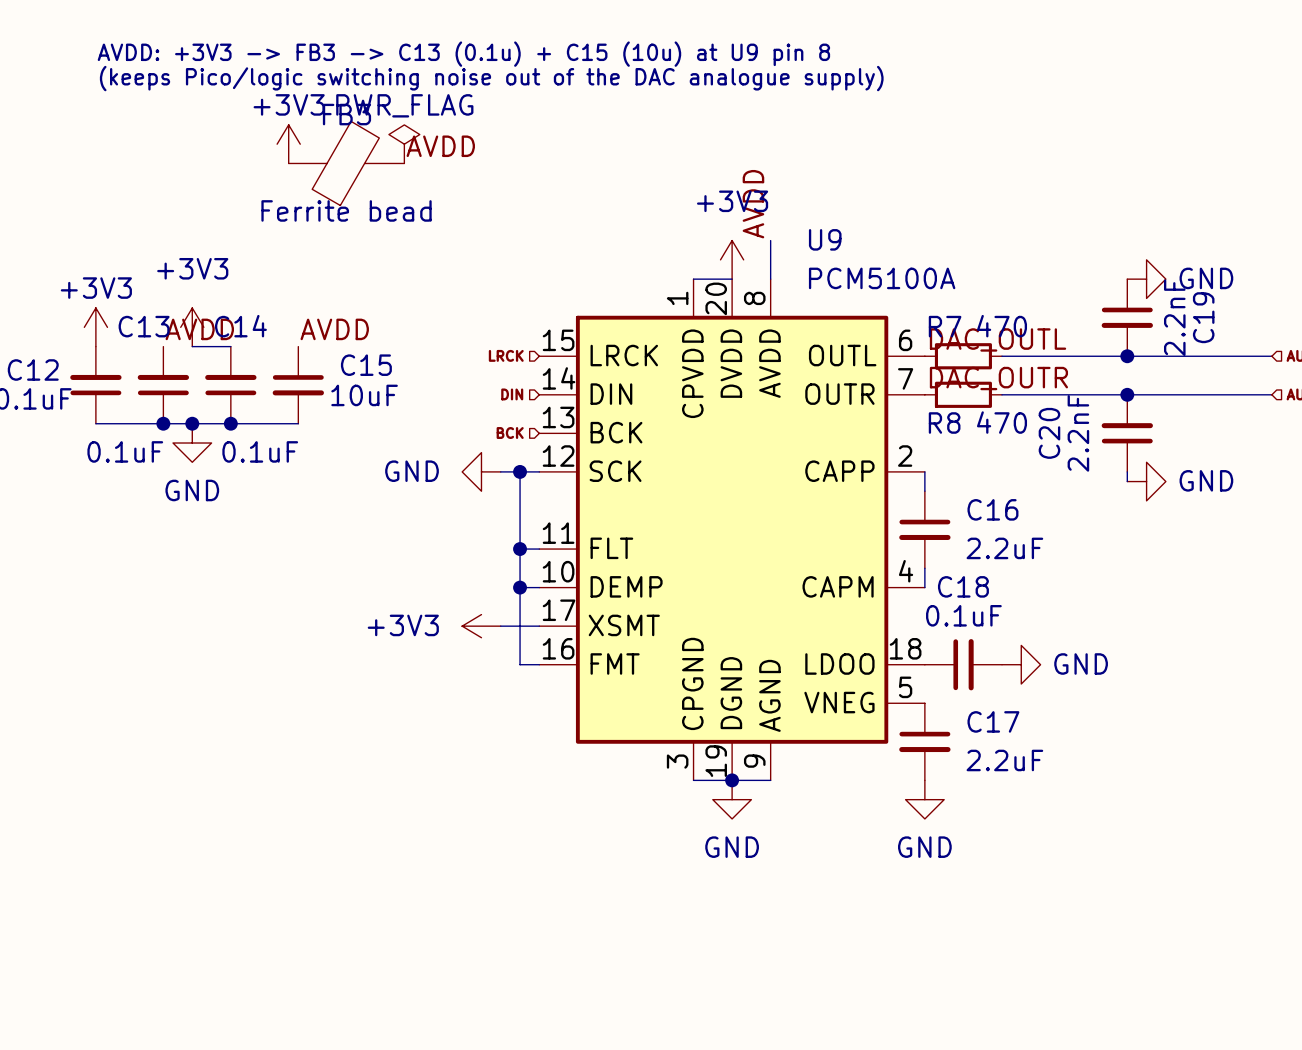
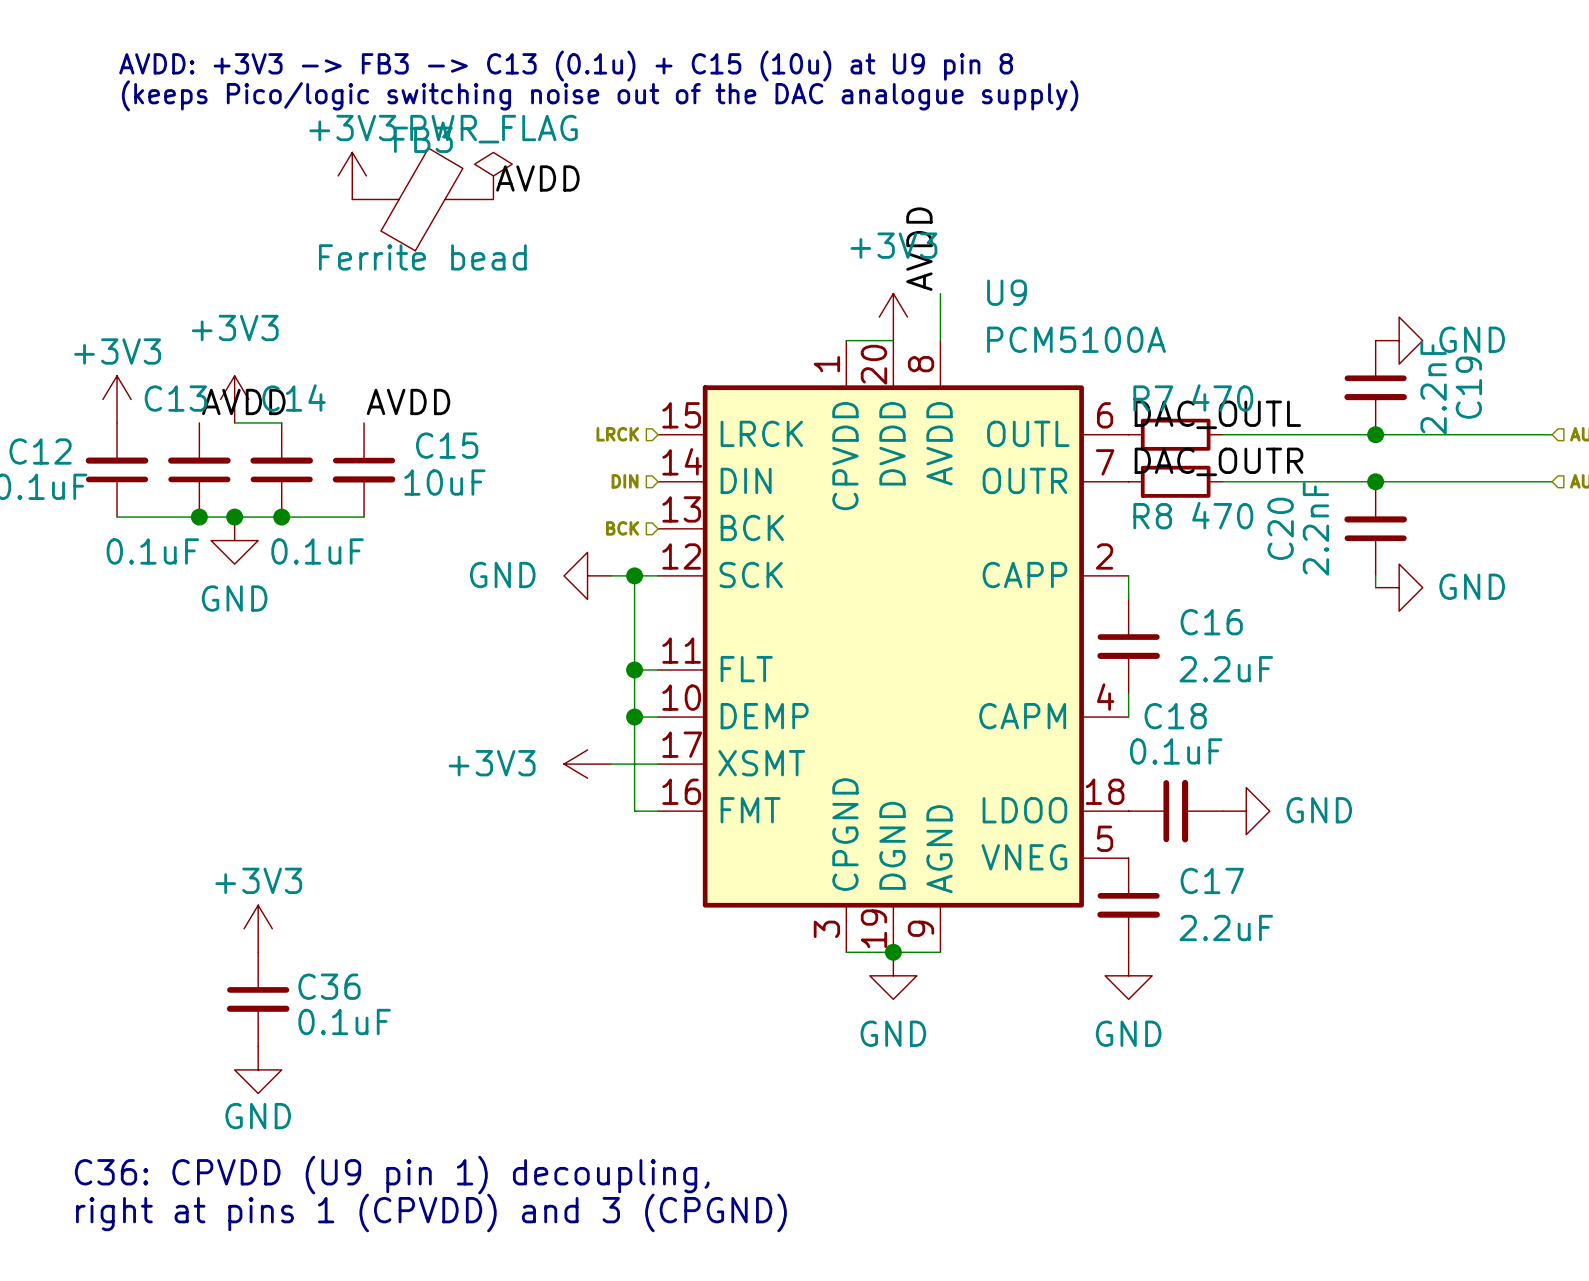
power symbol: none -> +3V3 (258, 928)
C36: none -> 0.1uF (258, 999)
power symbol: none -> GND (258, 1069)
text: none -> C36: CPVDD (U9 pin 1) decoupling, (392, 1175)
text: none -> right at pins 1 (CPVDD) and 3 (CPGND) (431, 1212)

